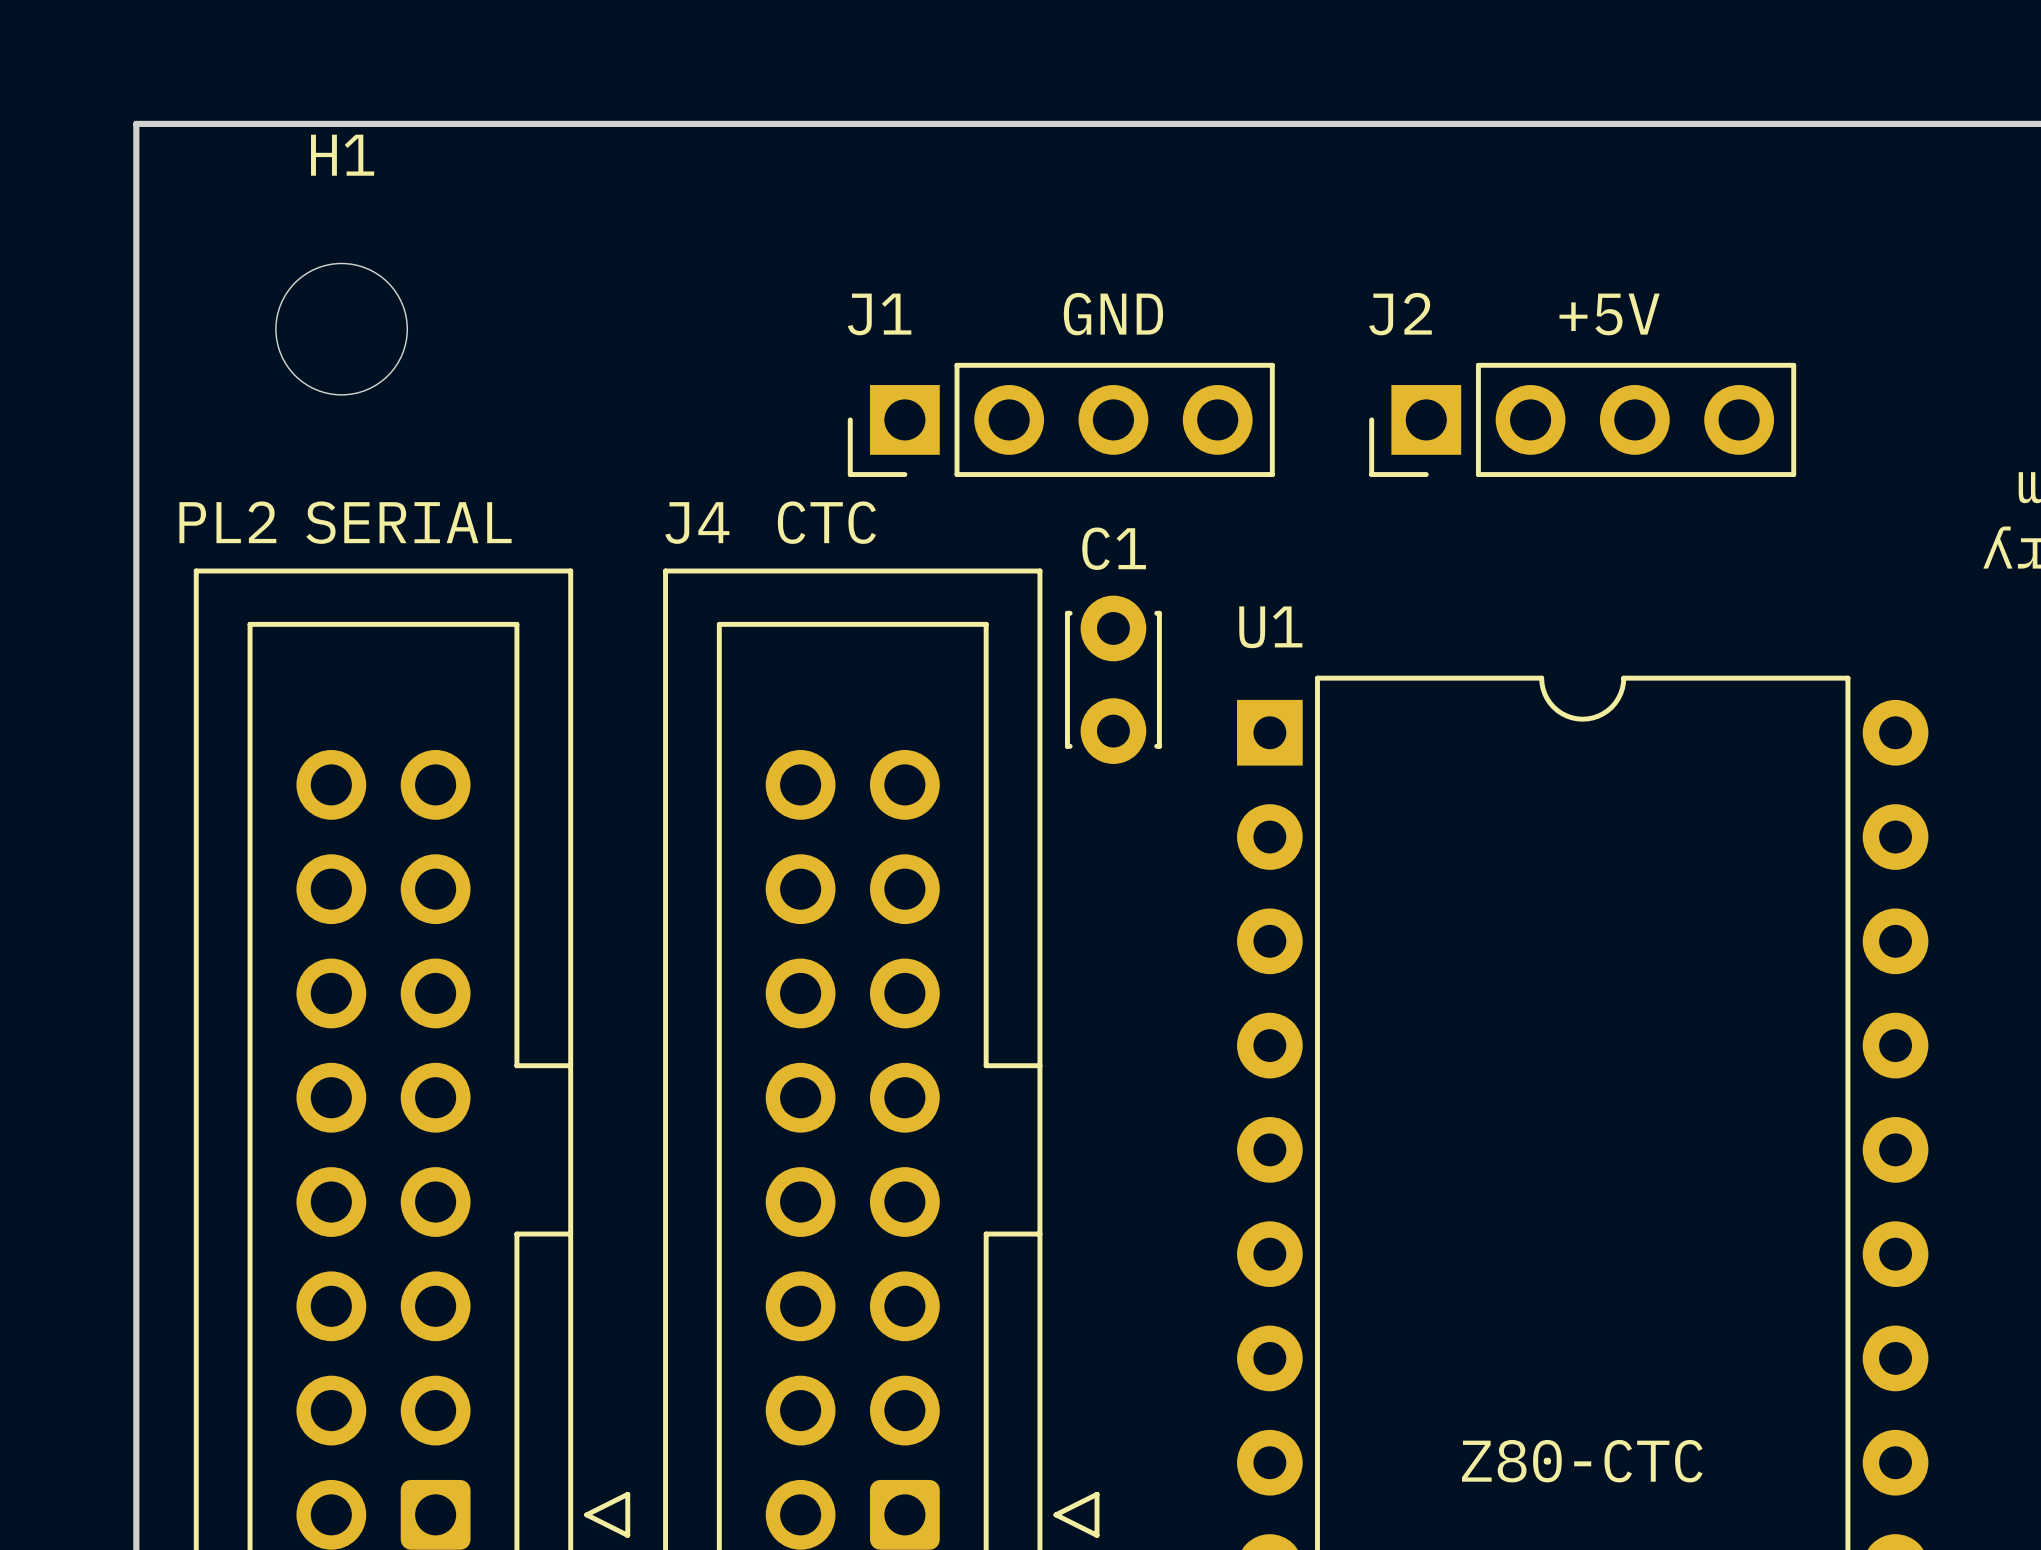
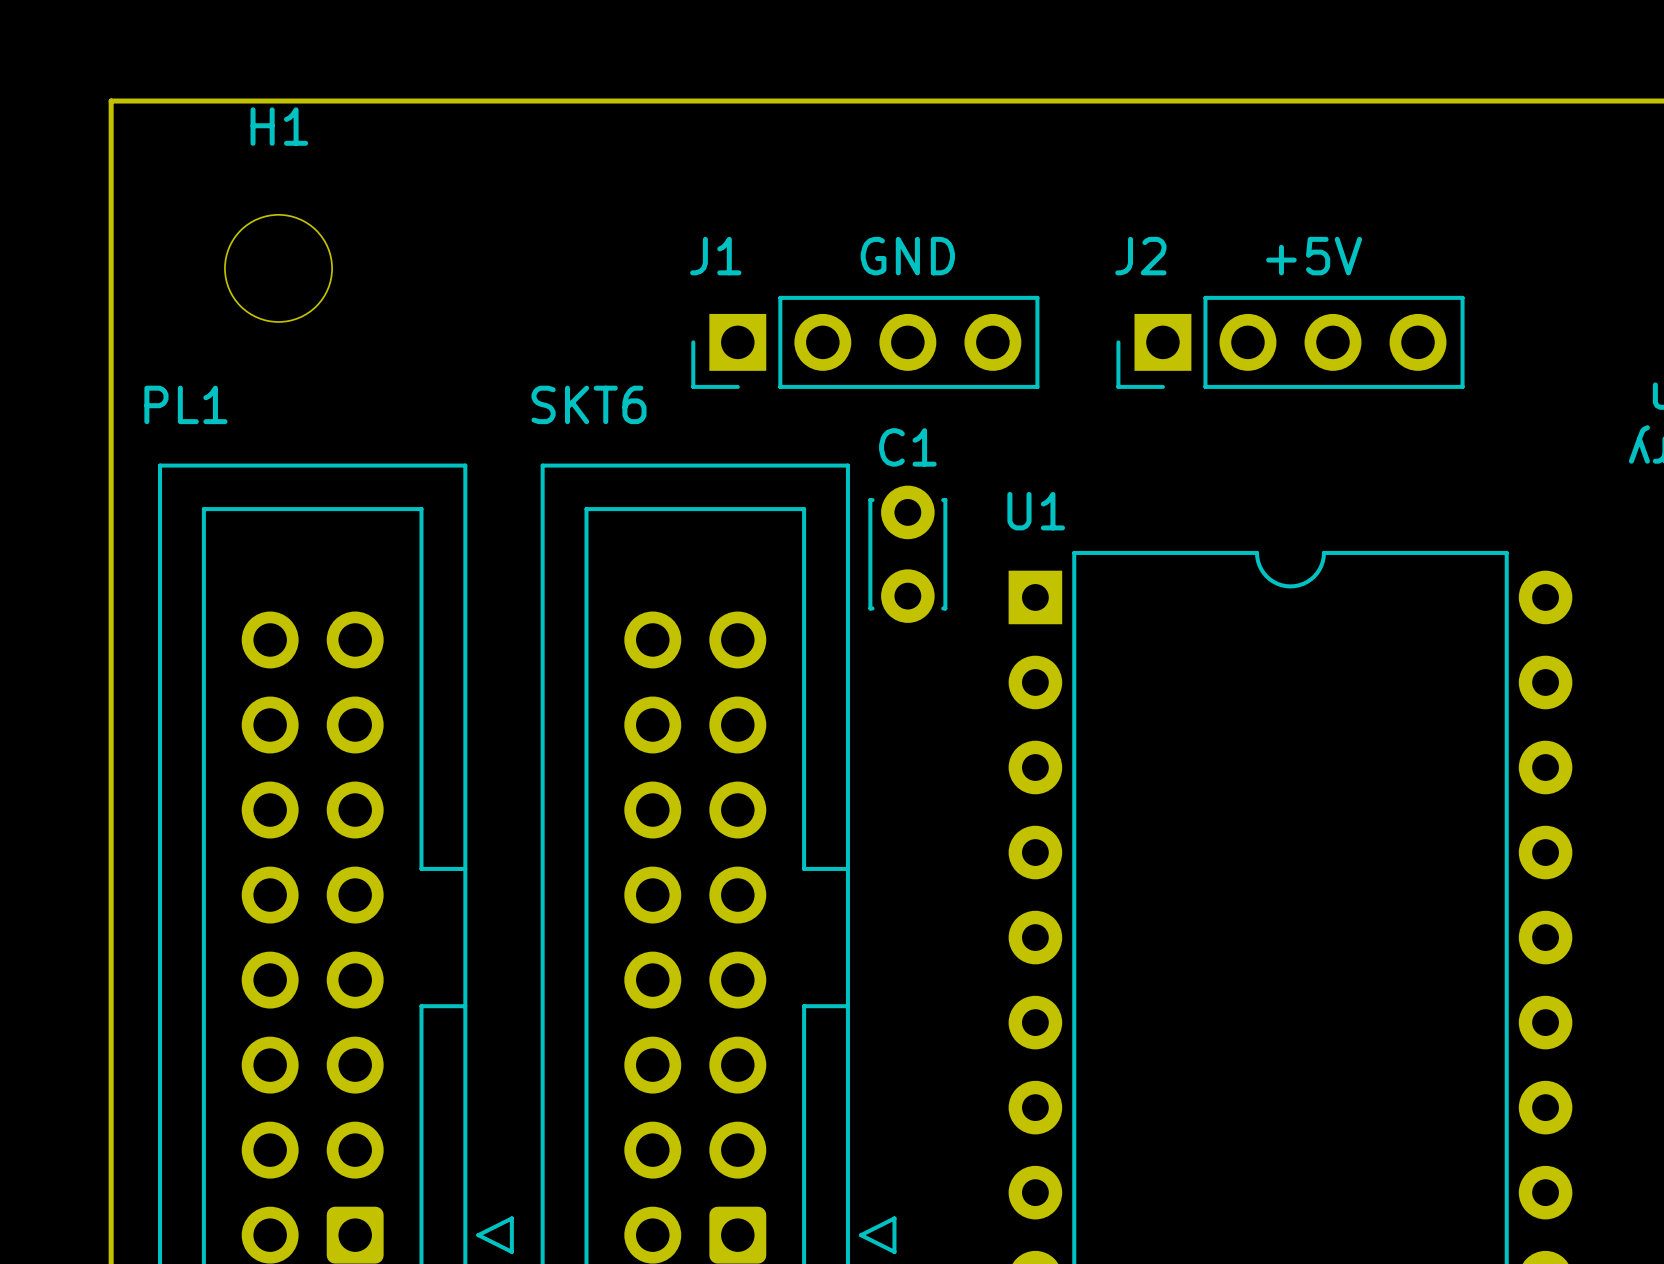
PL2 name: PL2 (227, 522) -> PL1 (185, 404)
text: SERIAL (408, 522) -> none
text: CTC (826, 522) -> none
J4 name: J4 (697, 523) -> SKT6 (589, 404)
text: Z80-CTC (1582, 1461) -> none

